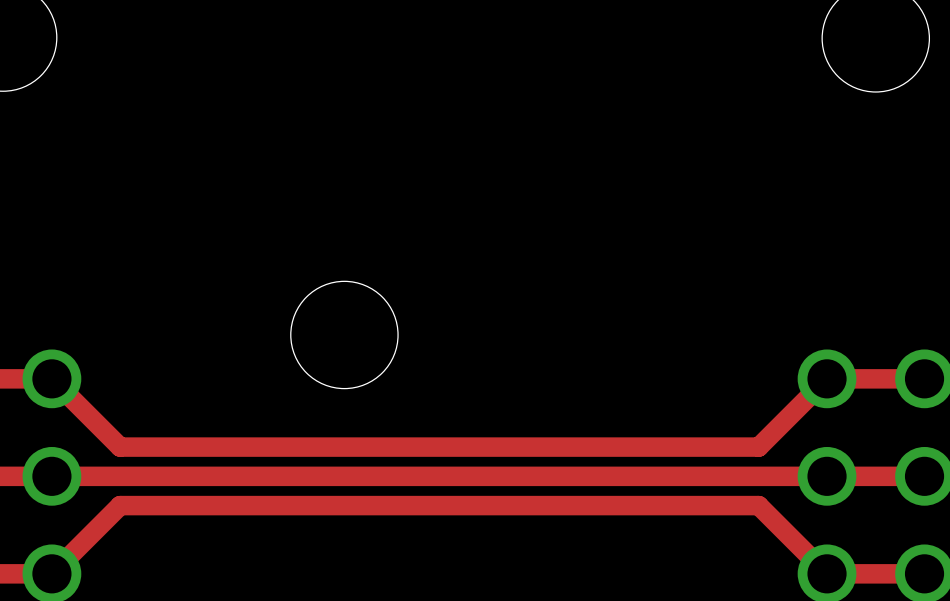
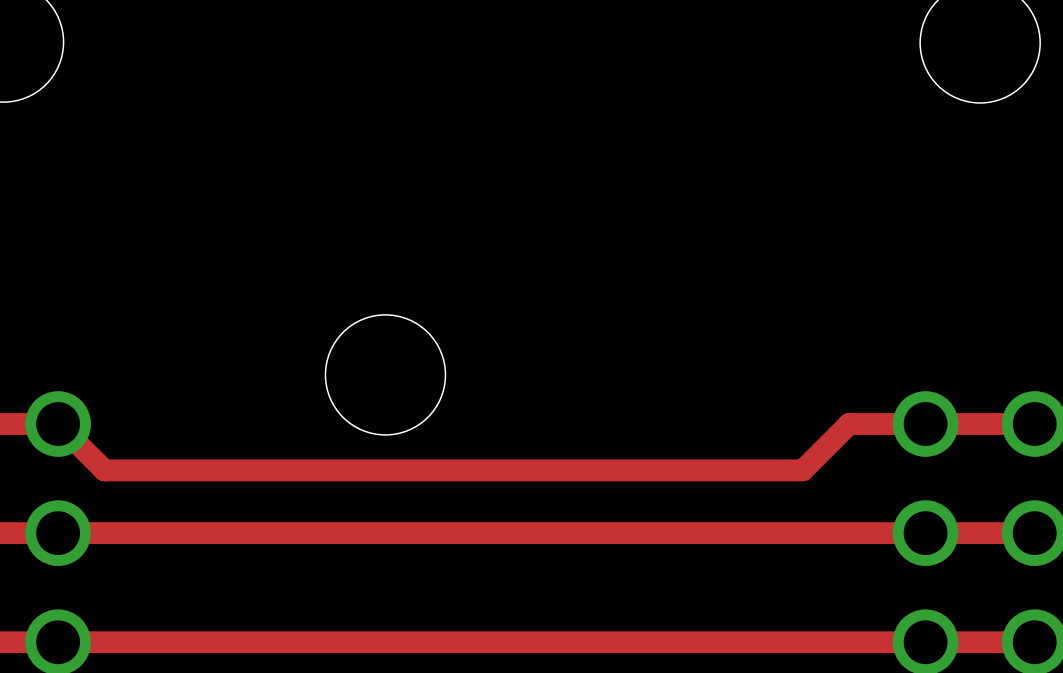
top track: (827, 378) (758, 447) (120, 447) (93, 420) -> (925, 424) (849, 424) (802, 470) (104, 470)
top track: (827, 573) (758, 505) (120, 505) (51, 573) -> (925, 642) (58, 642)

